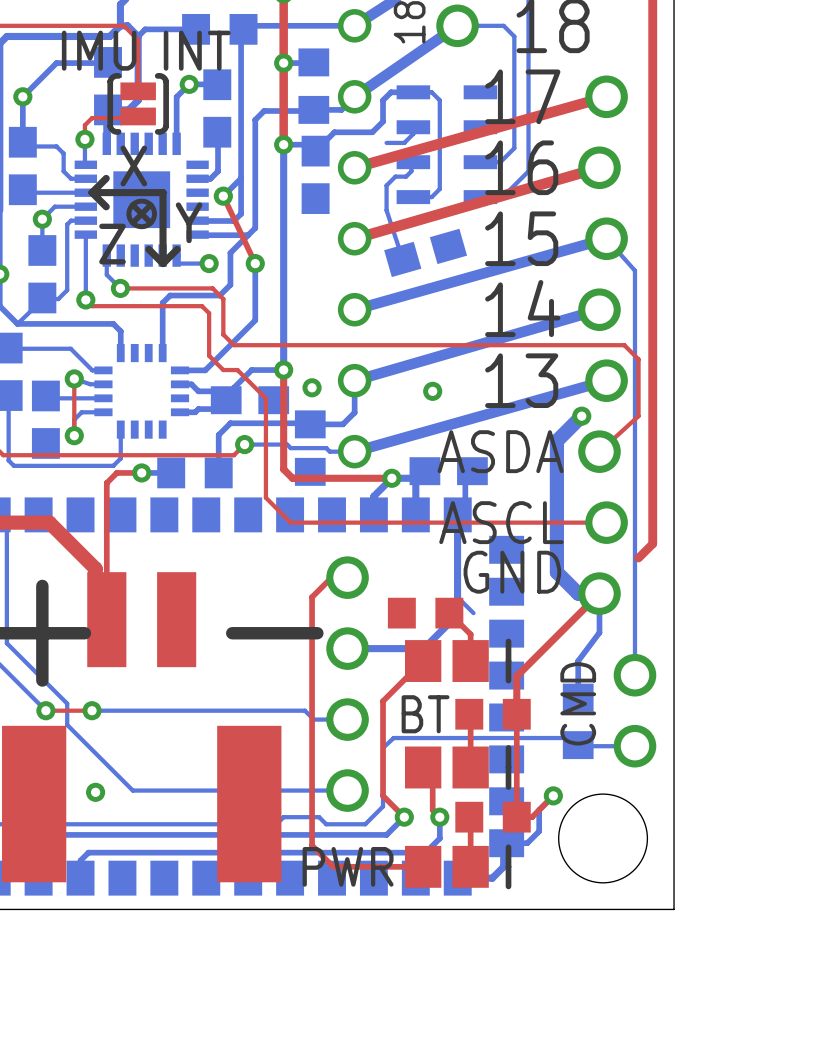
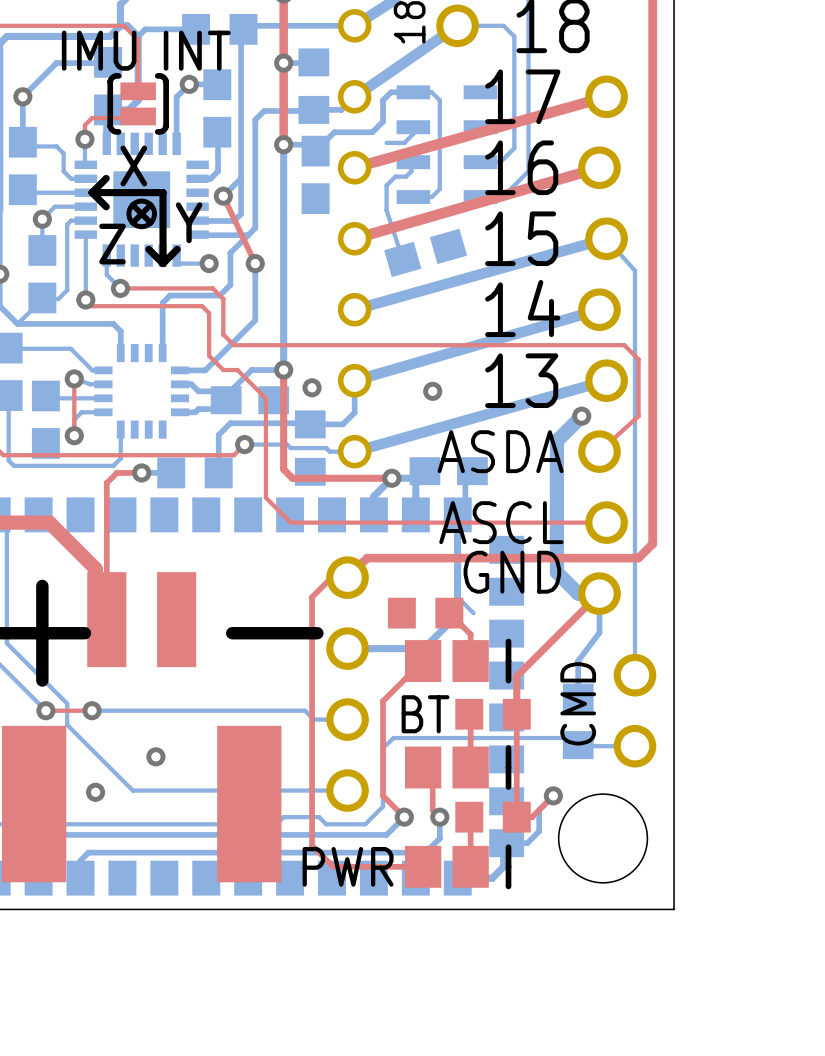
top track: none -> (638, 558) (367, 558) (347, 577)
via: none -> (155, 756)

